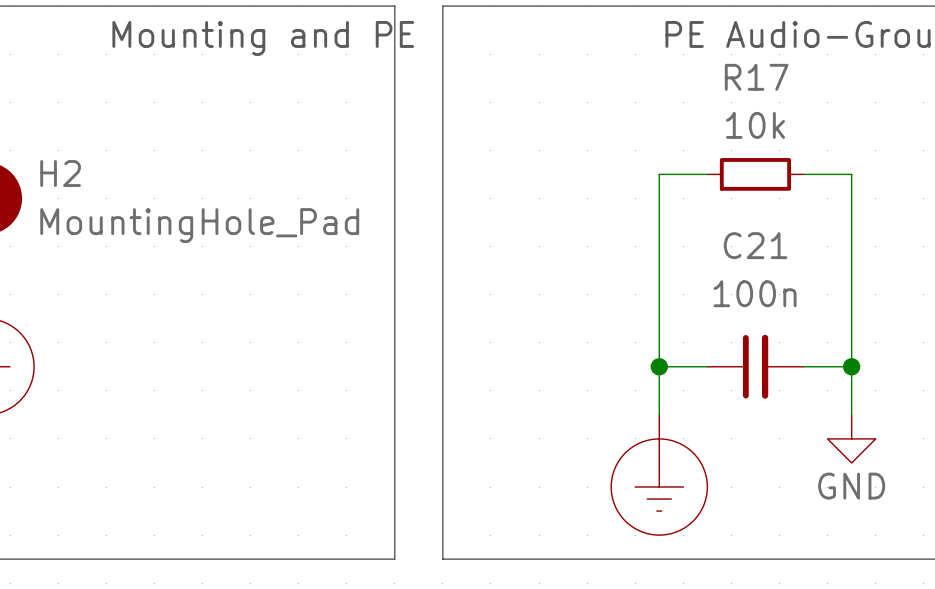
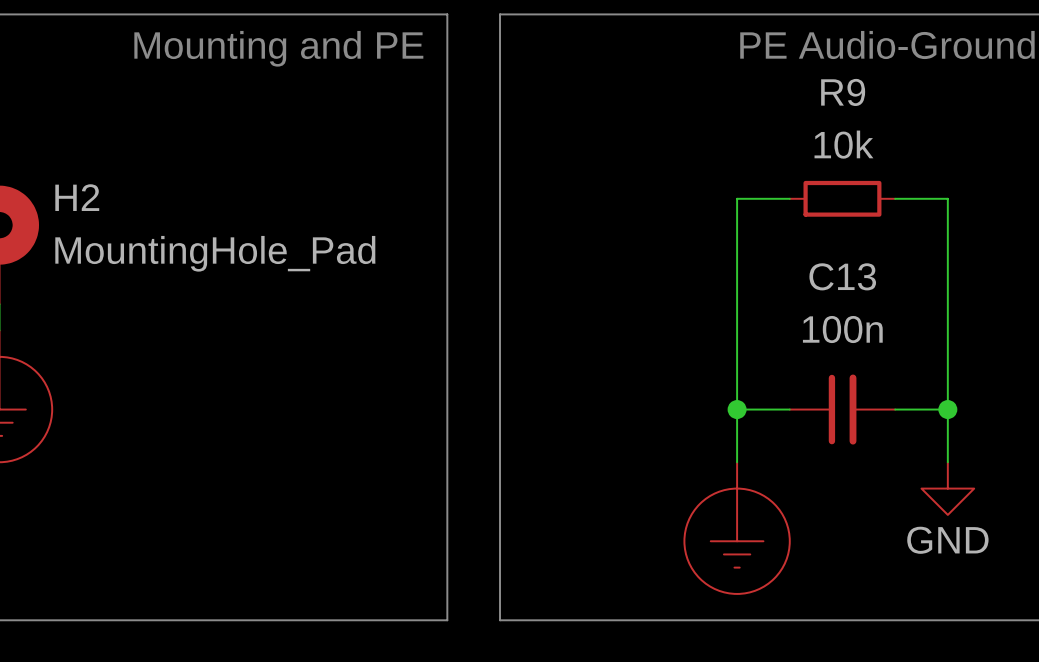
R17 name: R17 (756, 77) -> R9 (843, 92)
C21 name: C21 (755, 245) -> C13 (842, 276)

